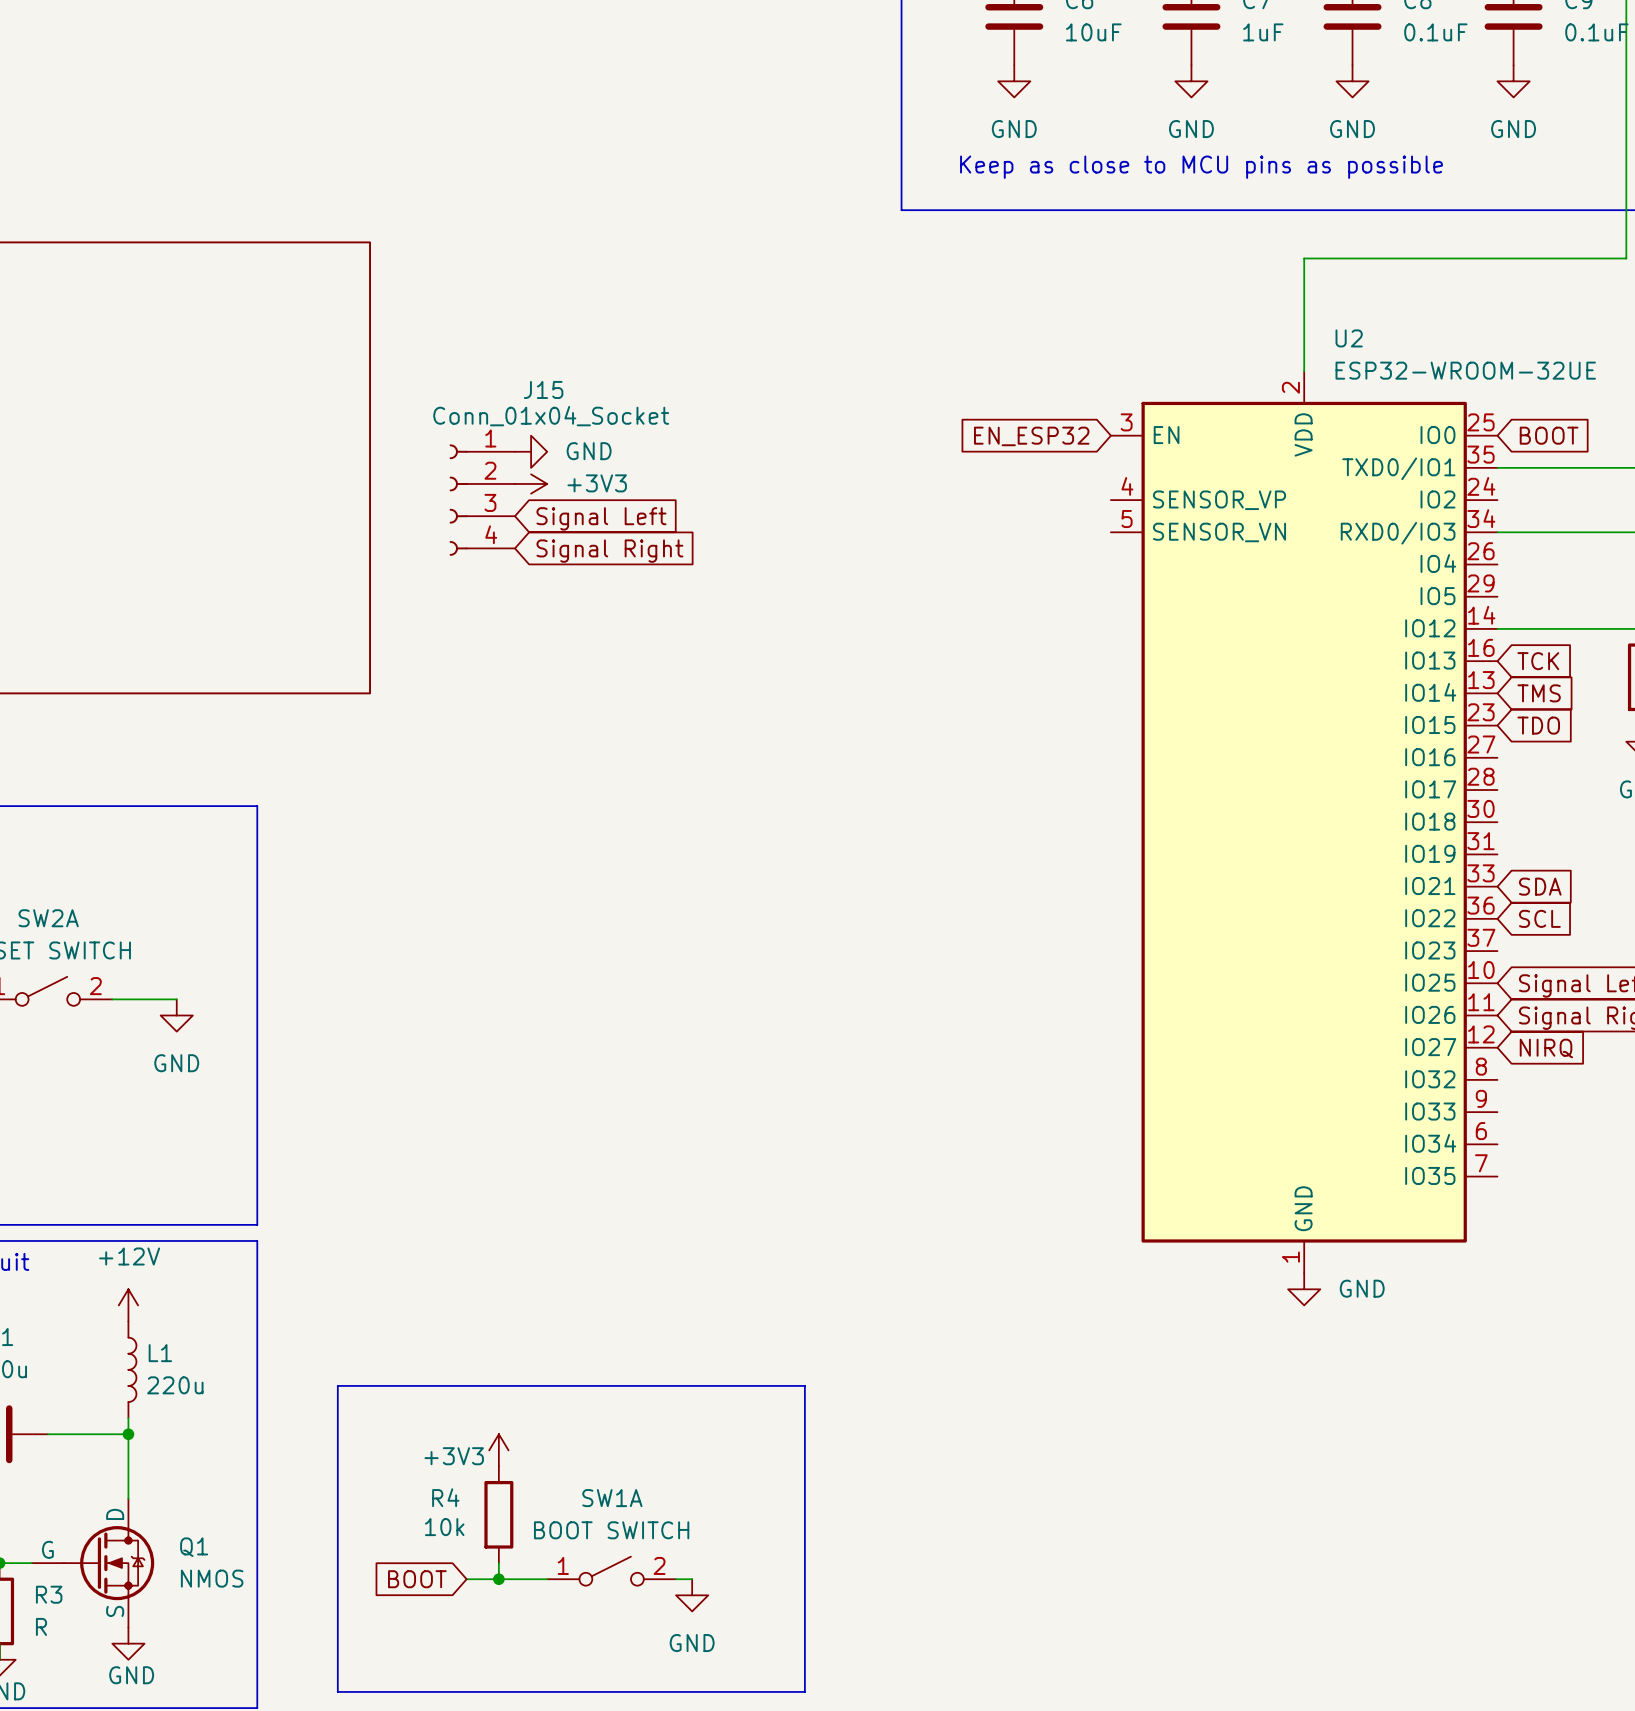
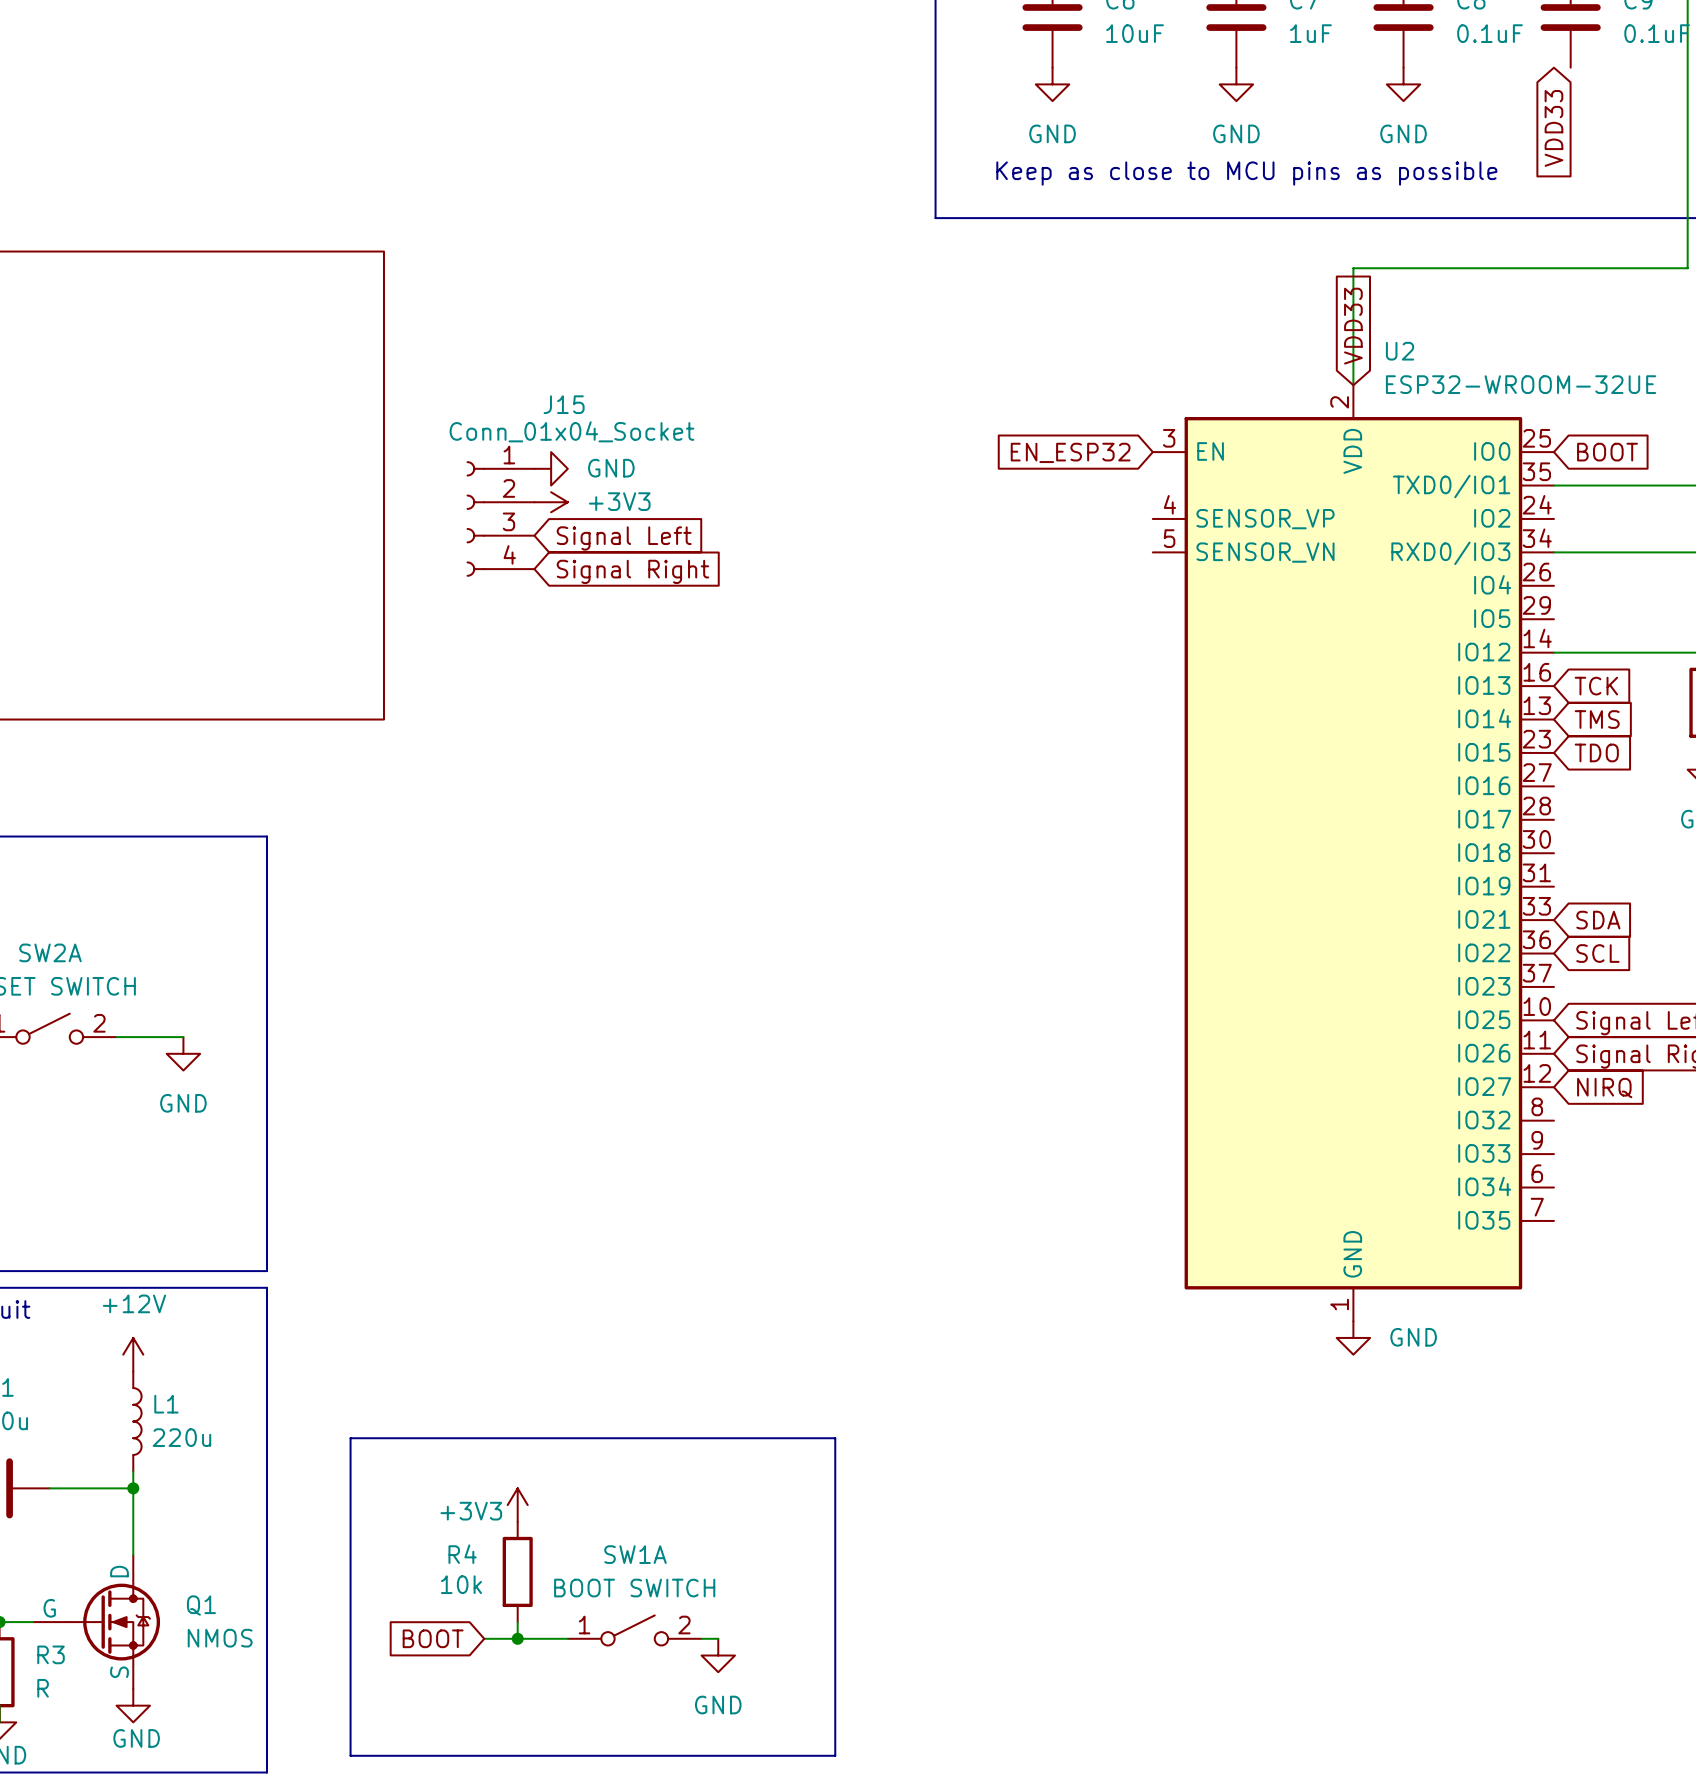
power symbol: GND (1513, 81) -> none
global label: none -> VDD33 (1553, 128)
global label: none -> VDD33 (1353, 326)

